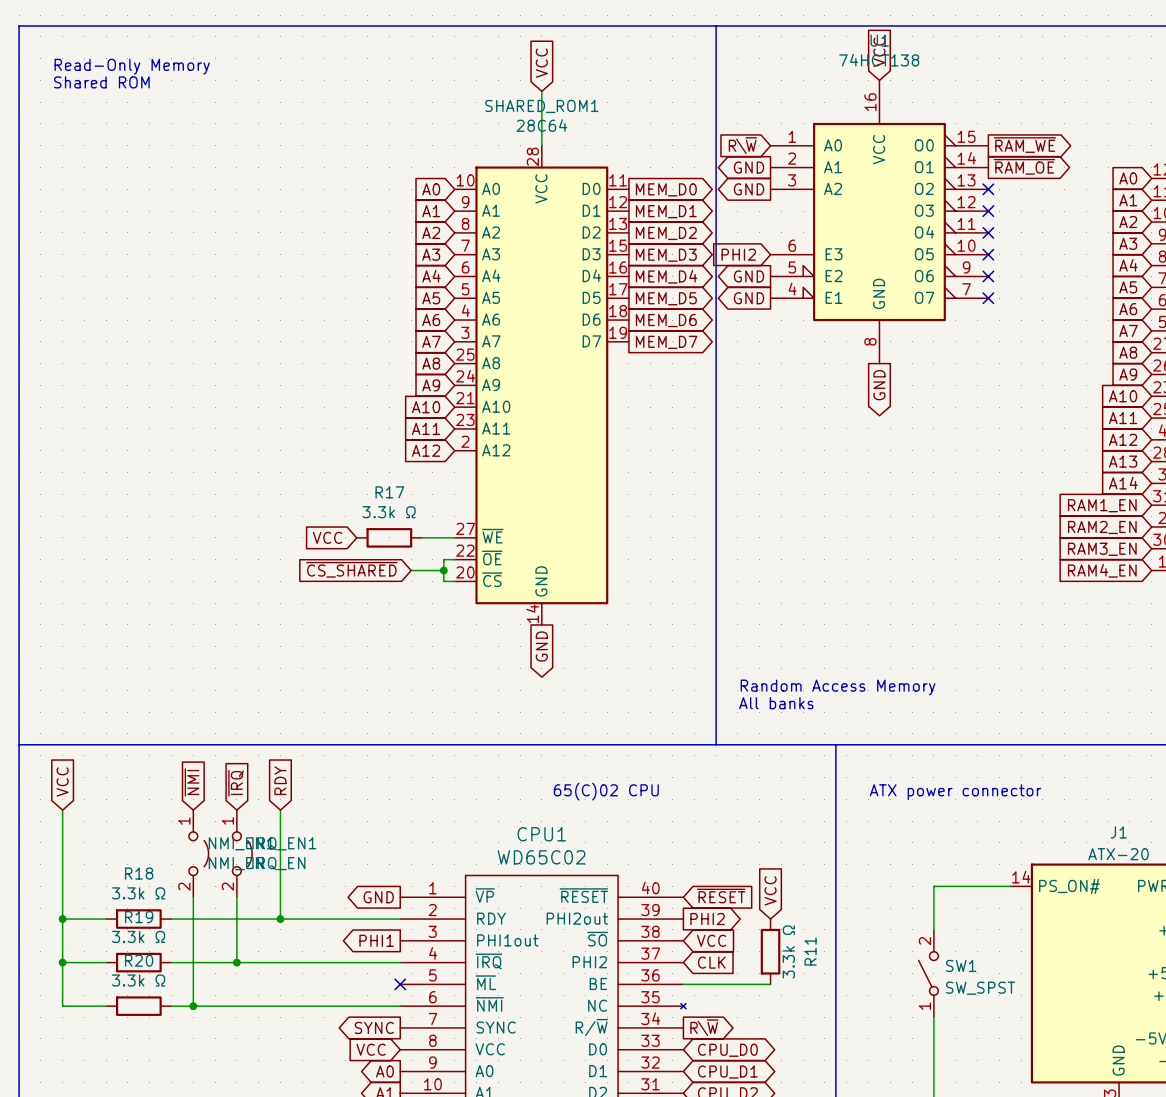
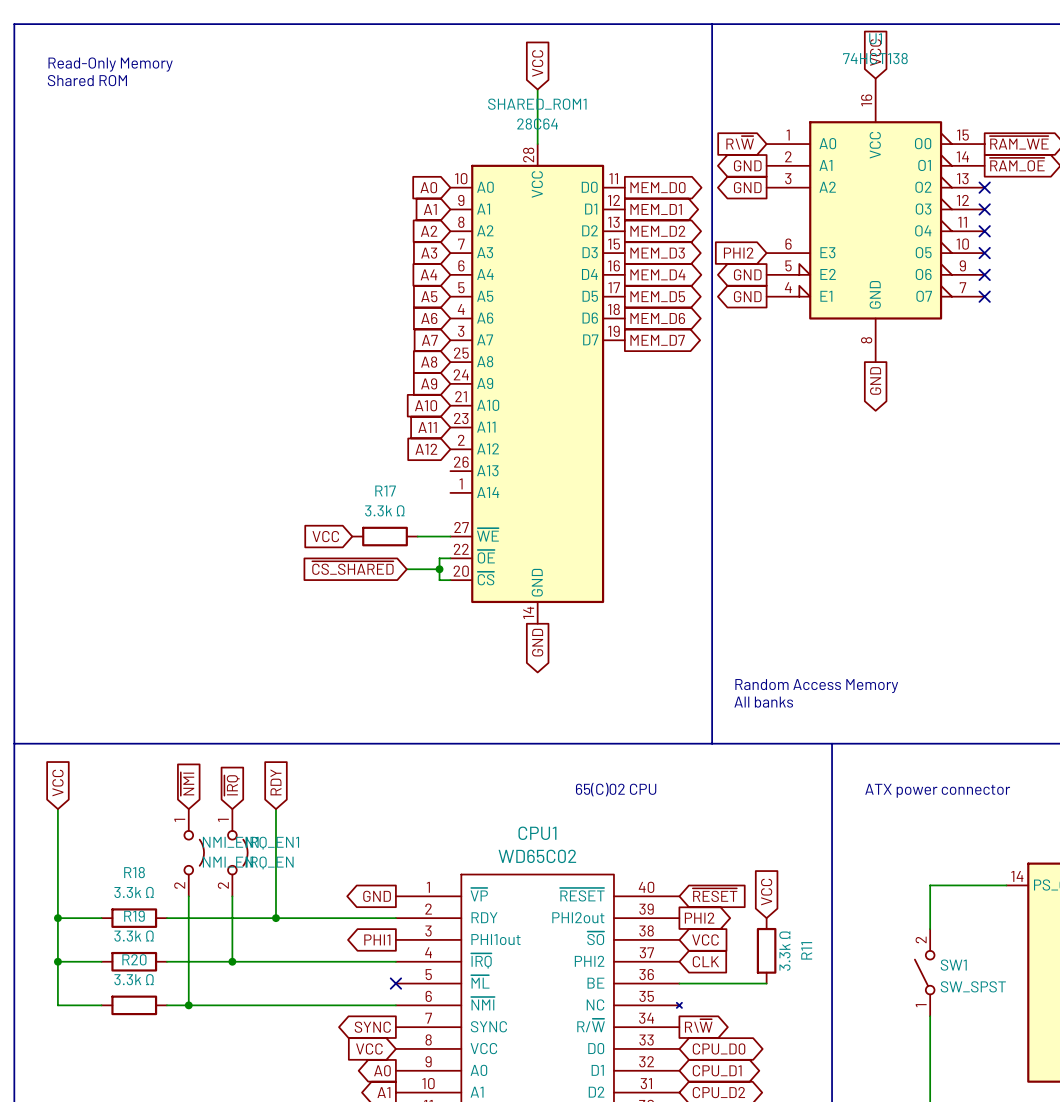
SHARED_ROM1 symbol: [454, 145, 629, 625] -> [450, 144, 625, 624]

